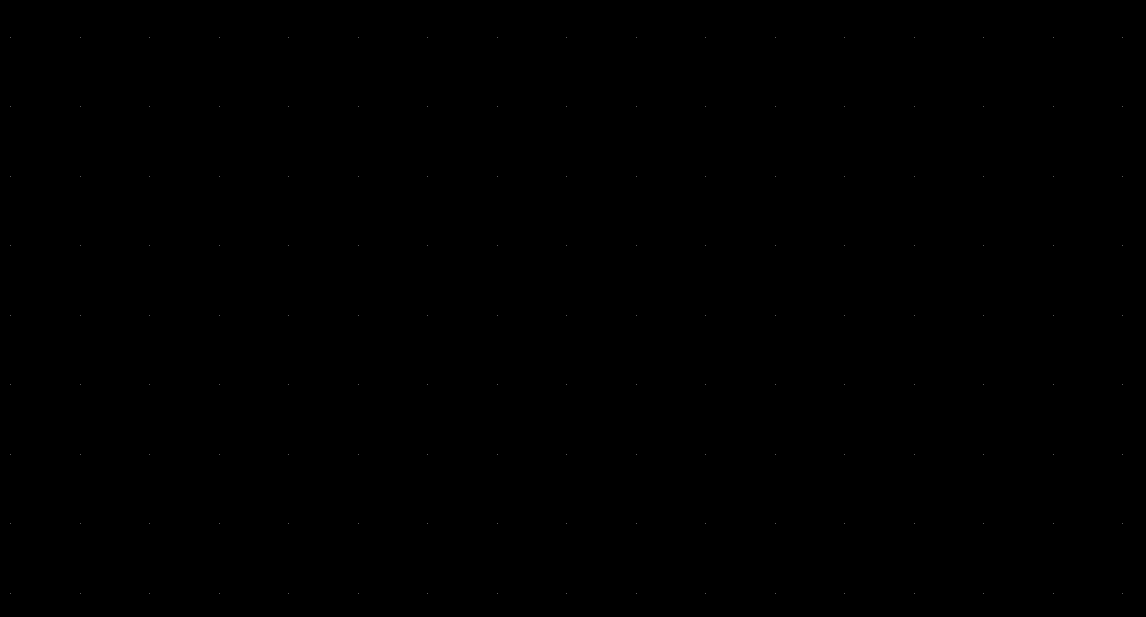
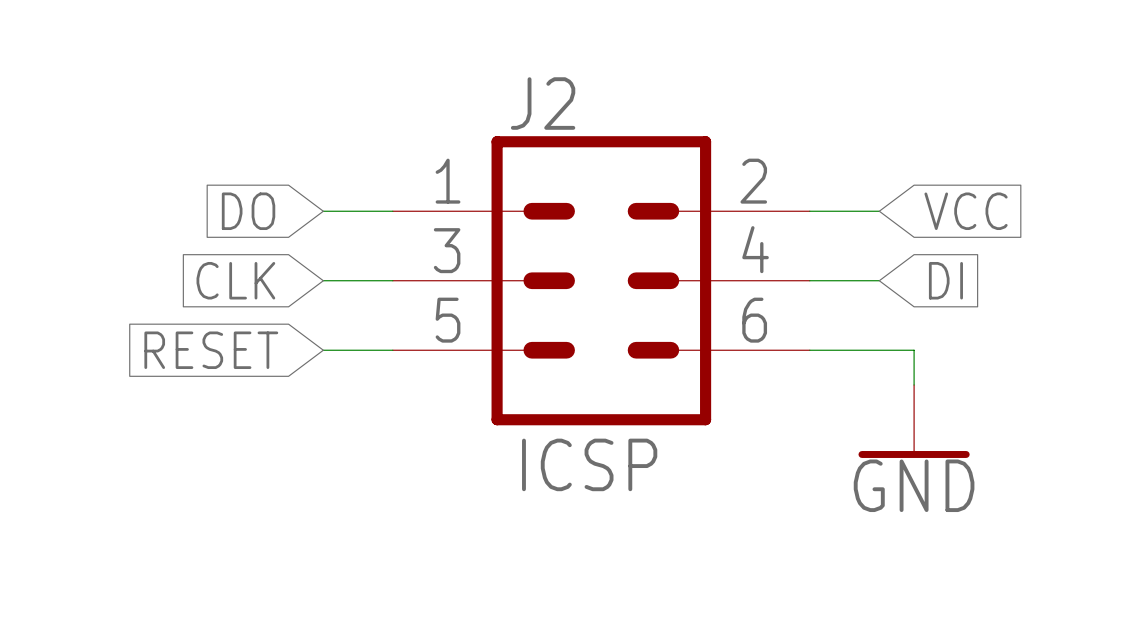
global label: none -> DO (248, 211)
wire: none -> (323, 211) (392, 211)
wire: none -> (809, 211) (879, 211)
global label: none -> VCC (966, 211)
global label: none -> CLK (235, 280)
wire: none -> (323, 280) (392, 280)
J2: none -> ICSP (601, 280)
wire: none -> (809, 280) (879, 280)
global label: none -> DI (945, 280)
global label: none -> RESET (211, 350)
wire: none -> (323, 350) (392, 350)
wire: none -> (809, 350) (914, 350) (914, 384)
power symbol: none -> GND (914, 421)

